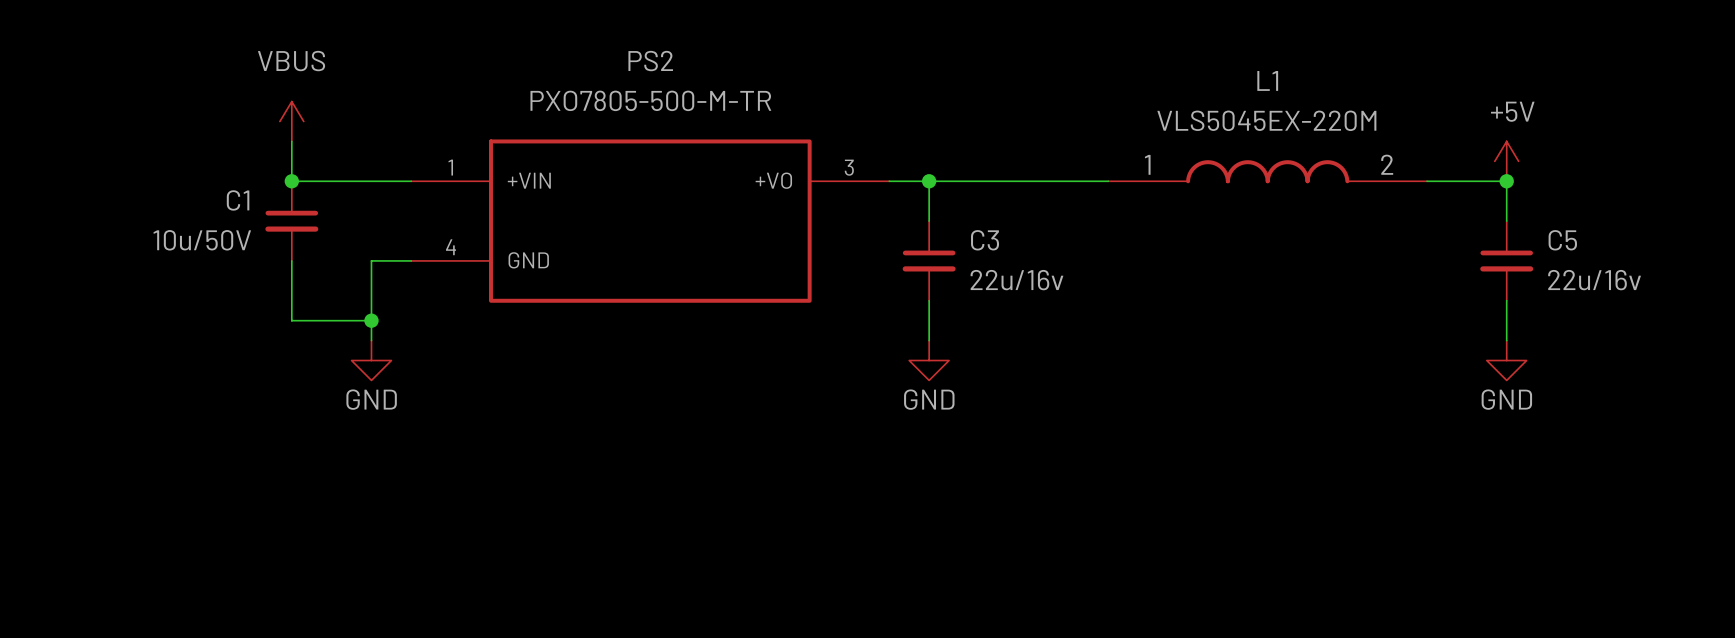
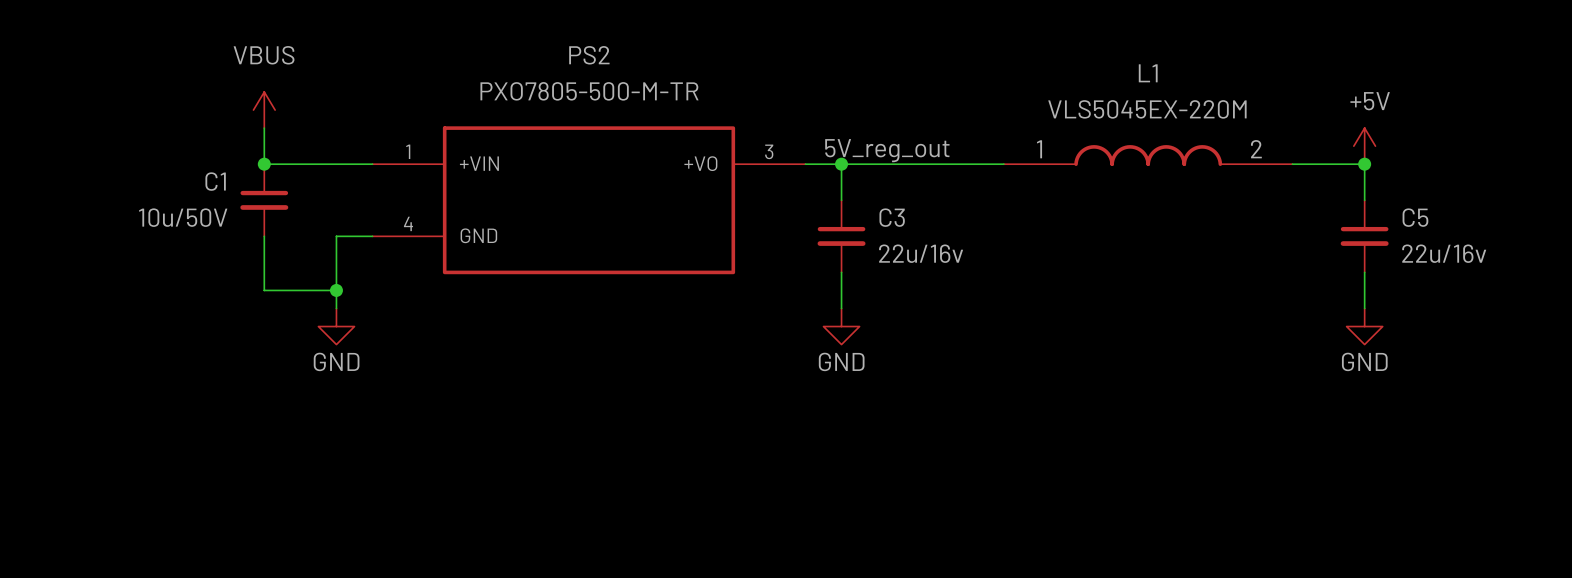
label: none -> 5V_reg_out (887, 150)

